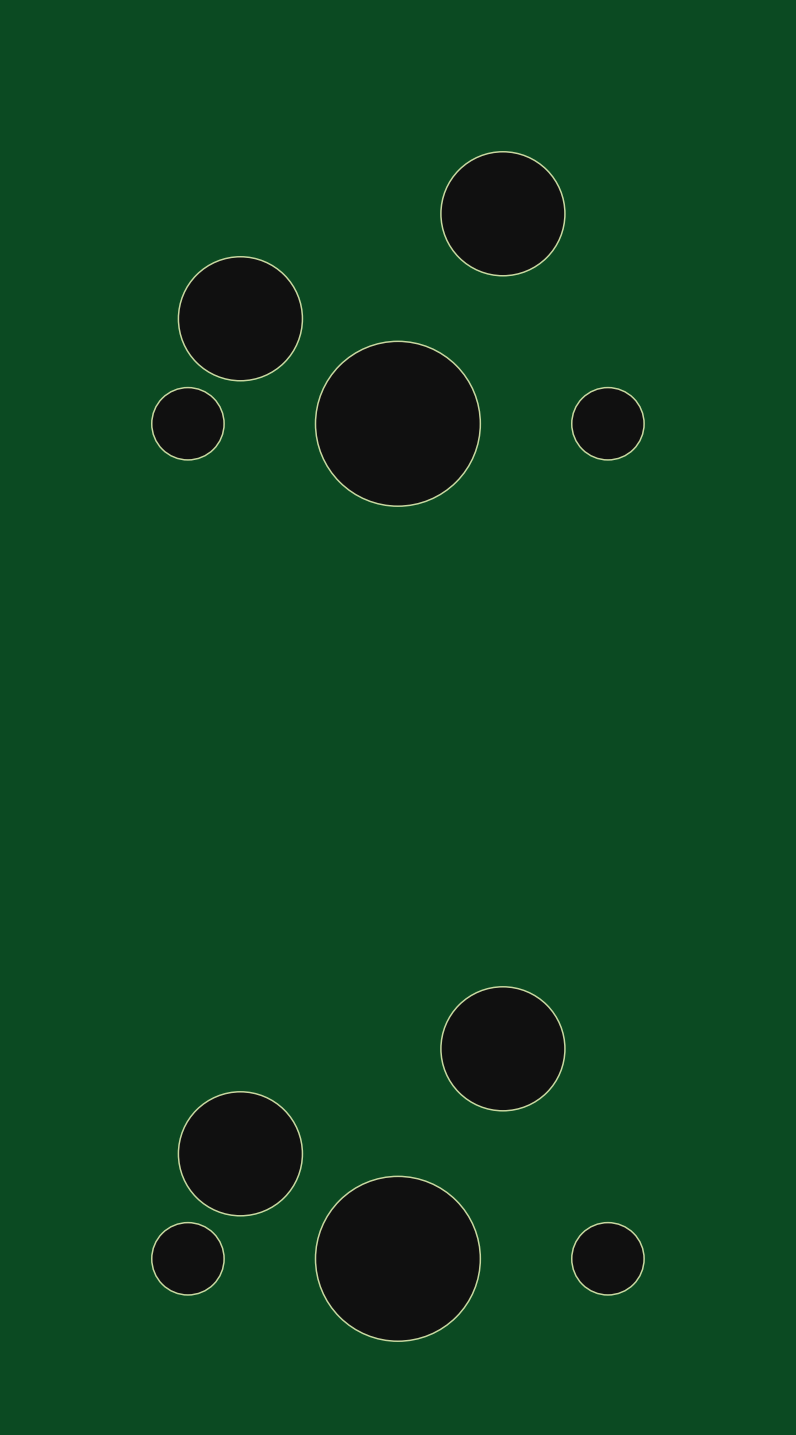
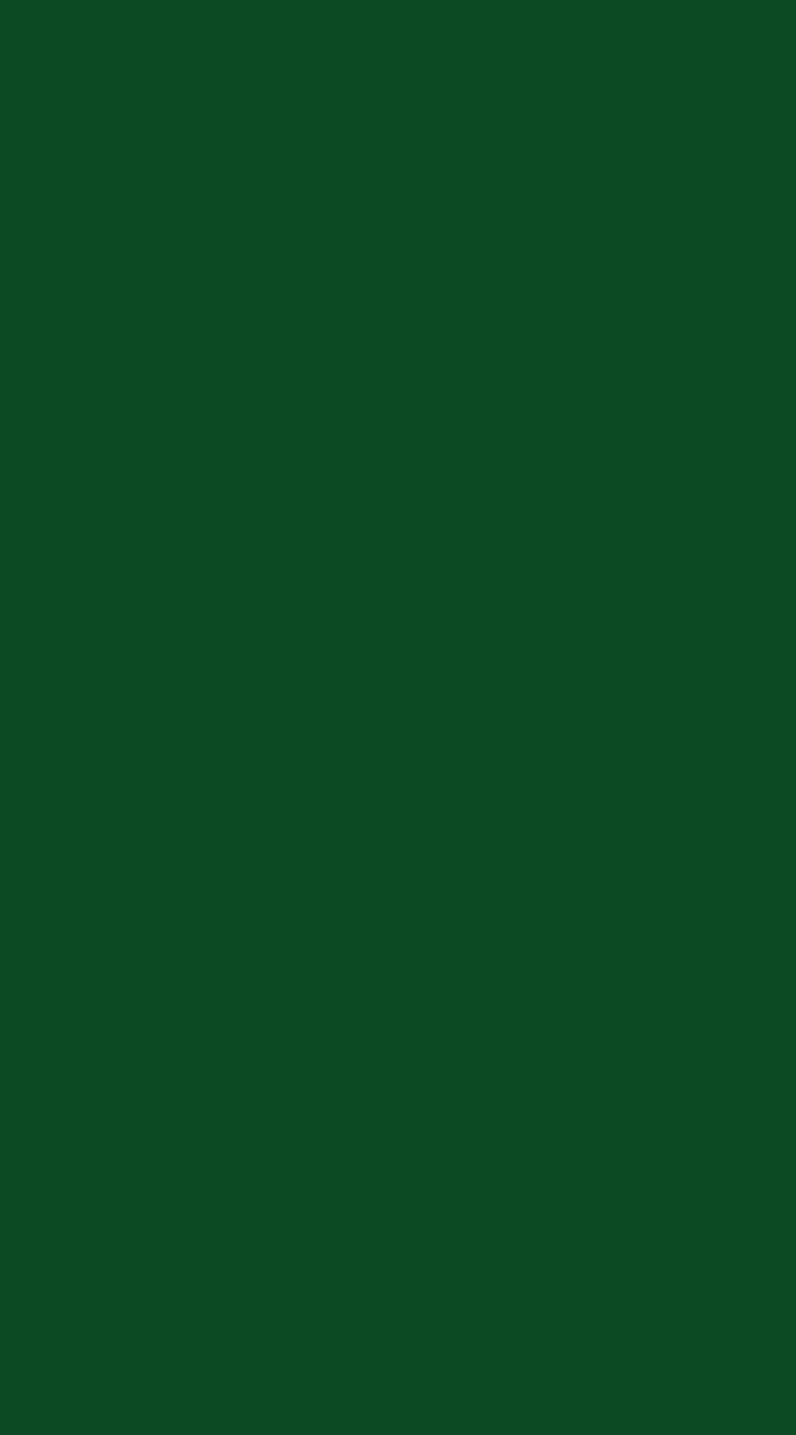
part: (397, 328) -> none
part: (397, 1164) -> none

